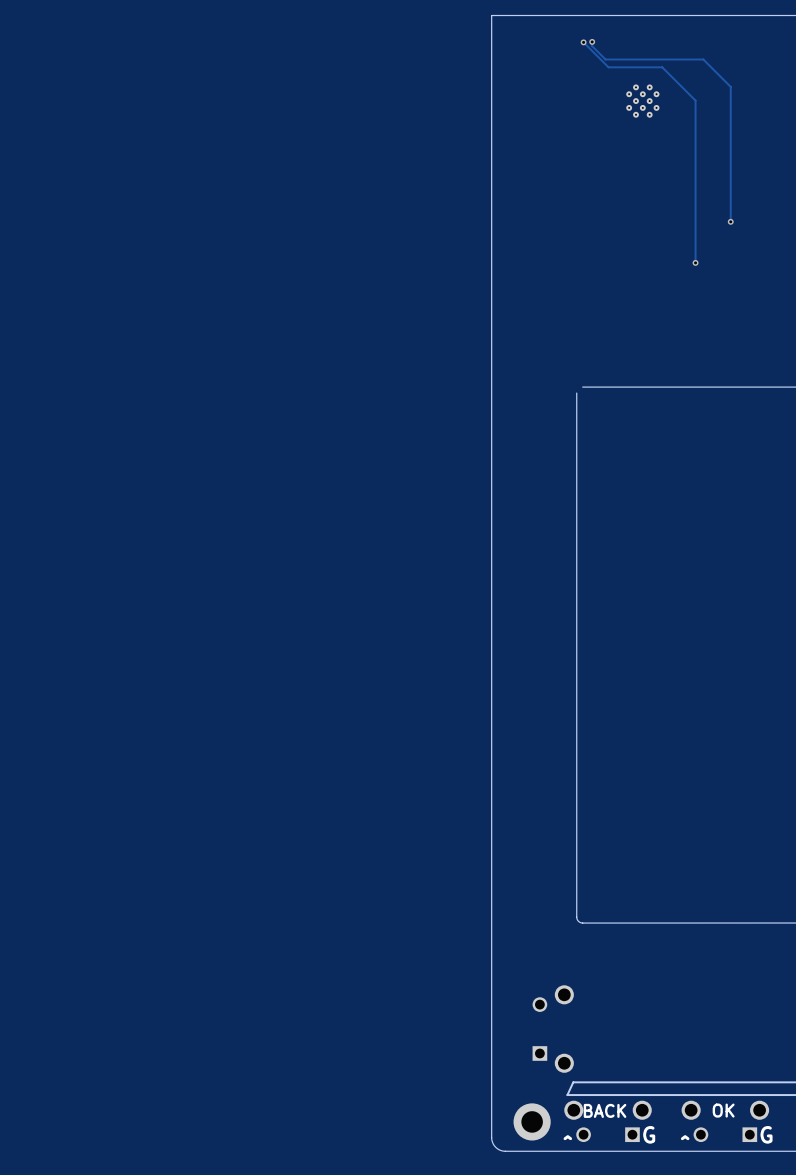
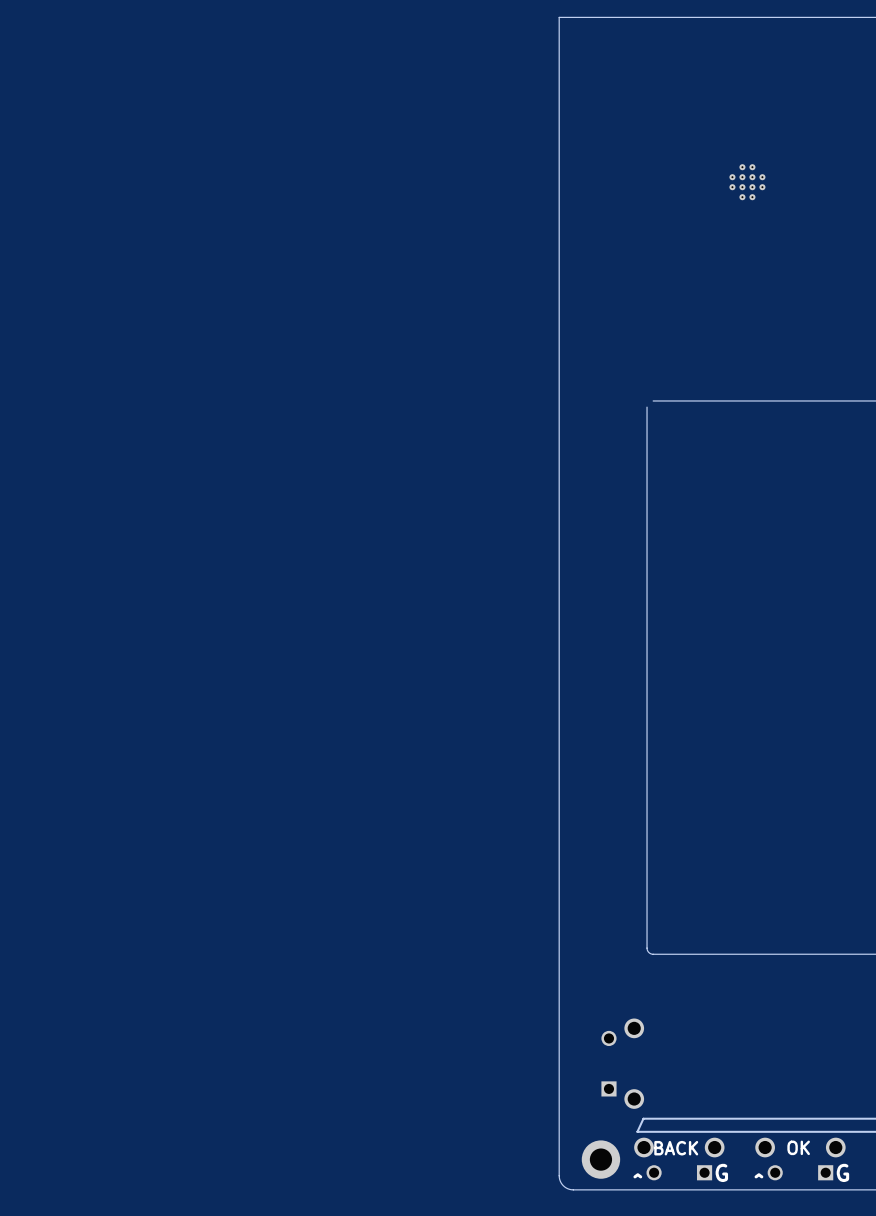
track: (592, 41) (592, 46) (605, 59) (703, 59) (730, 86) (730, 221) -> none
via: (592, 41) -> none
track: (583, 42) (608, 67) (662, 67) (695, 100) (695, 262) -> none
via: (583, 42) -> none
part: (642, 101) -> none
part: none -> (747, 182)
via: (730, 221) -> none
via: (695, 262) -> none

